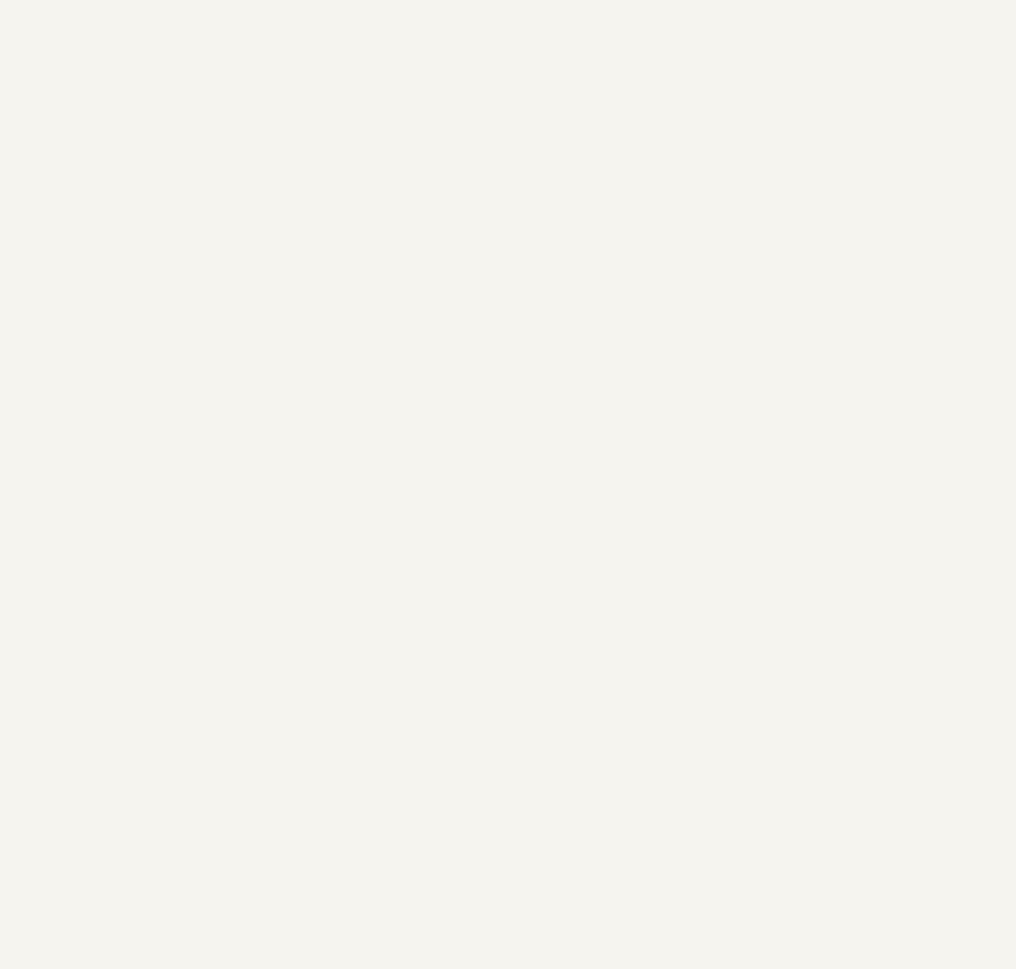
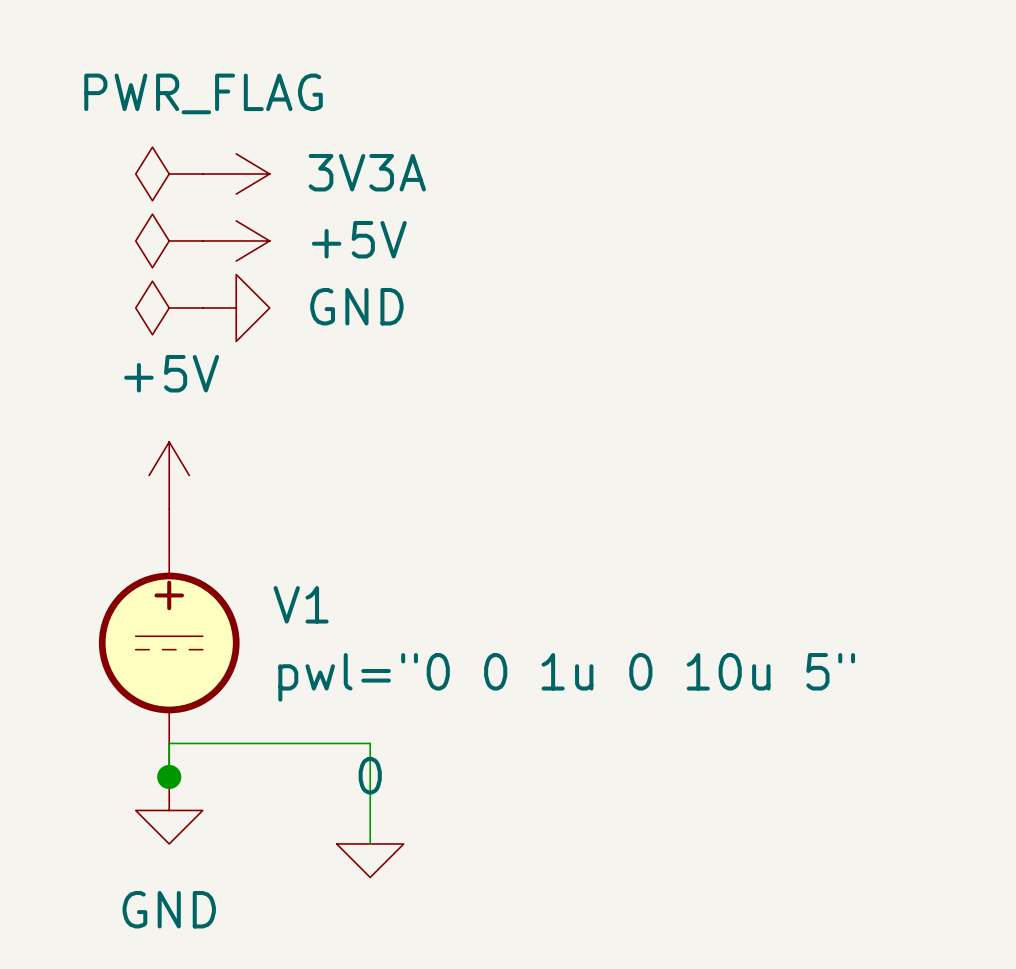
power symbol: none -> (169, 173)
power symbol: none -> 3V3A (236, 173)
power symbol: none -> PWR_FLAG (169, 240)
power symbol: none -> +5V (236, 240)
power symbol: none -> (169, 307)
power symbol: none -> GND (236, 307)
power symbol: none -> +5V (169, 475)
V1: none -> pwl="0 0 1u 0 10u 5" (169, 642)
wire: none -> (169, 776) (169, 743) (370, 743) (370, 843)
junction: none -> (169, 776)
power symbol: none -> GND (169, 810)
power symbol: none -> 0 (370, 860)

